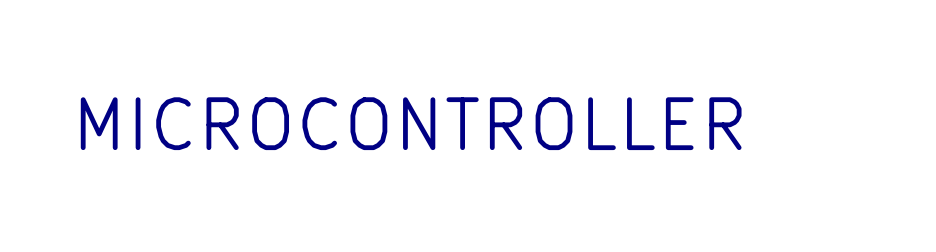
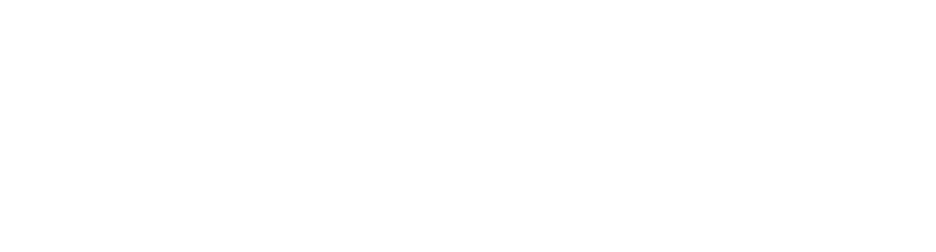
text: MICROCONTROLLER (411, 123) -> none

